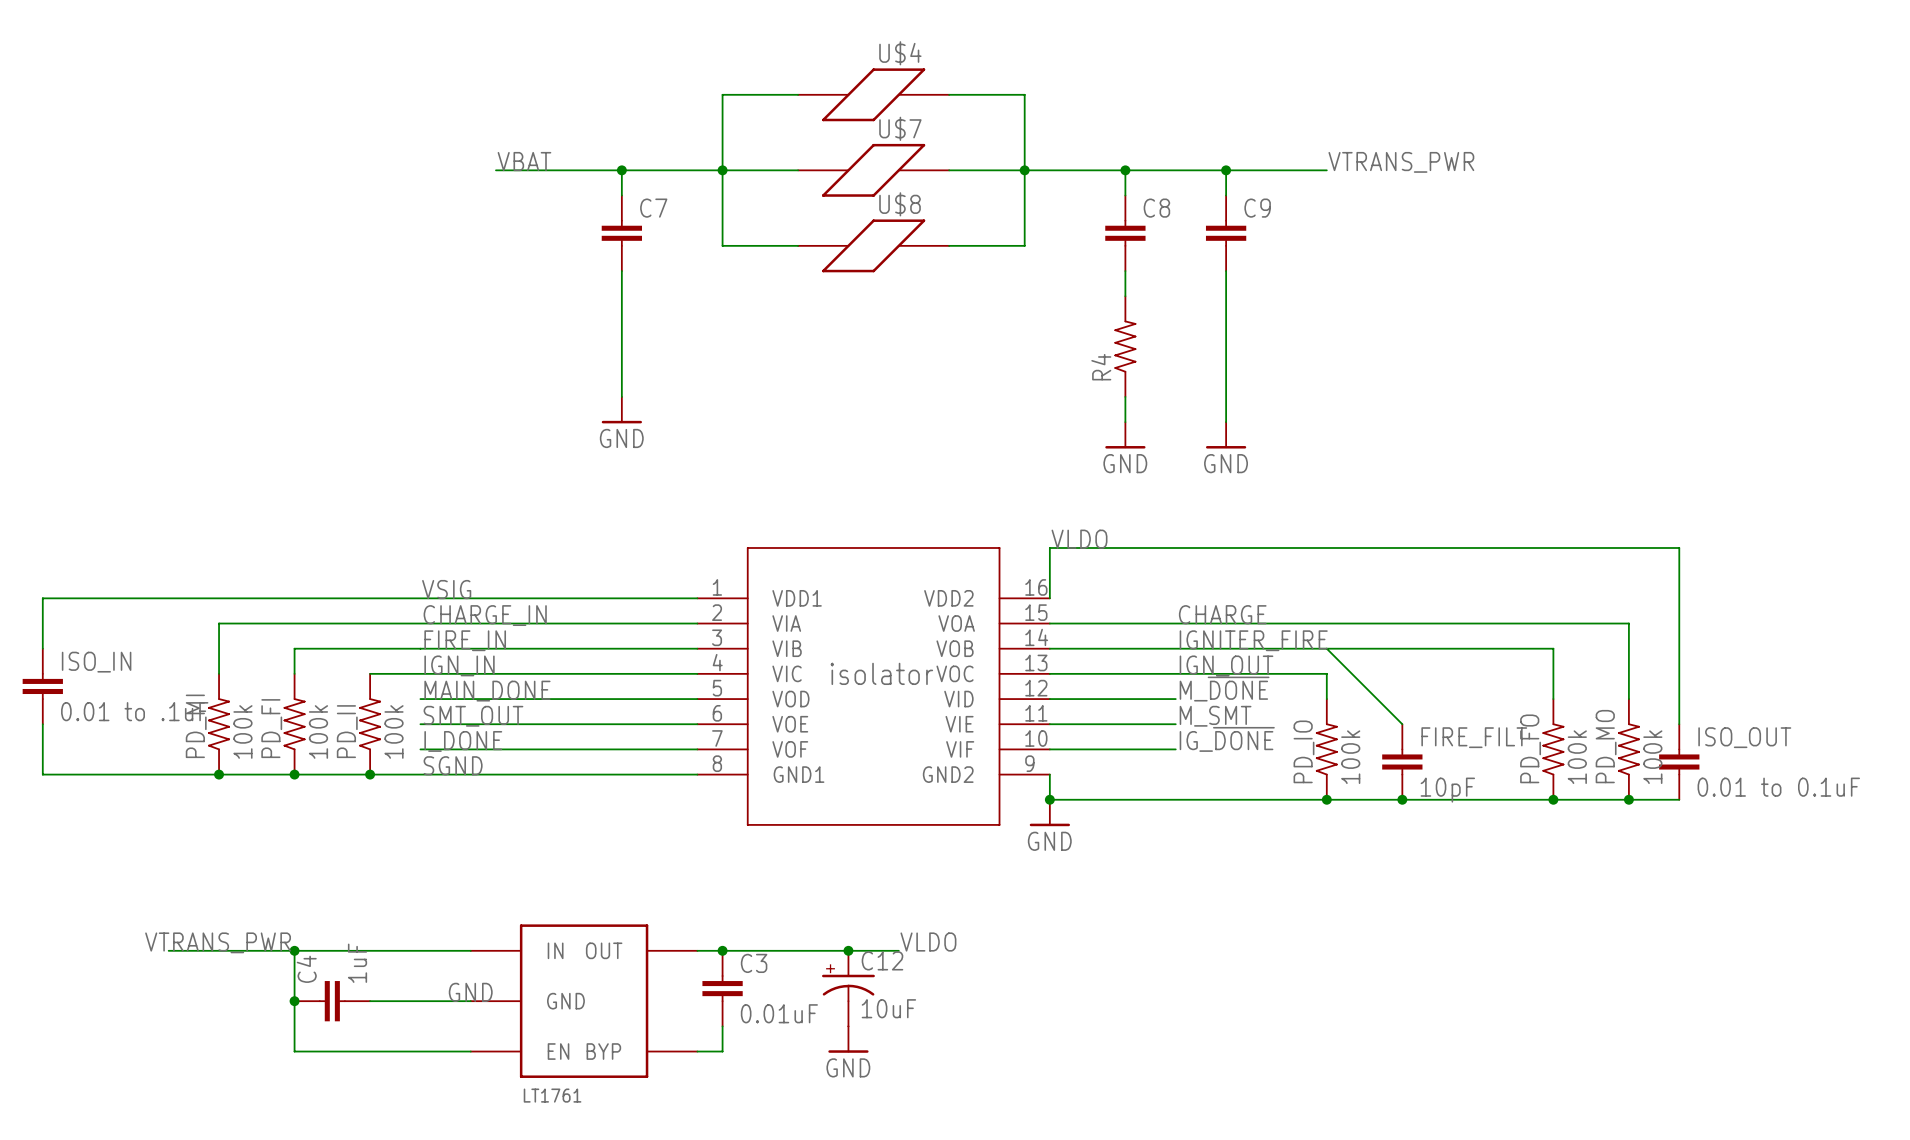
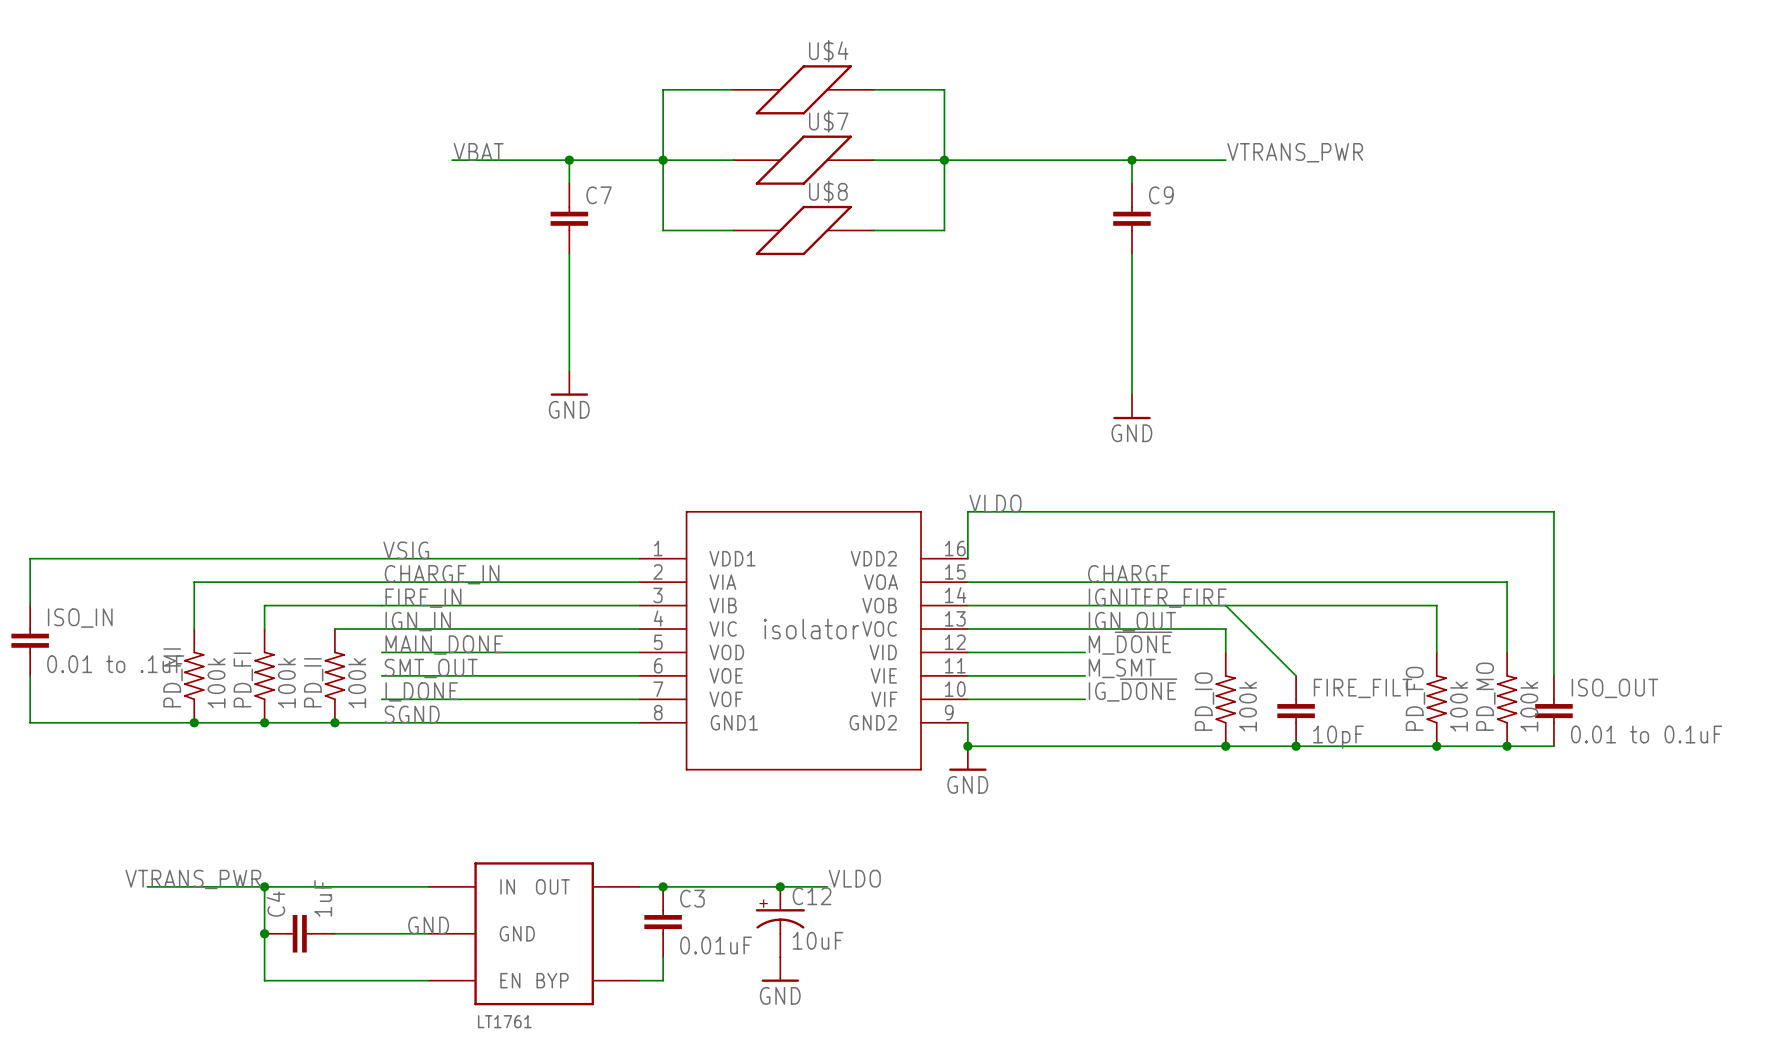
wire: (1125, 170) (1125, 195) -> none
junction: (1125, 170) -> none
C8: (1125, 233) -> none
wire: (1125, 271) (1125, 296) -> none
R4: (1125, 346) -> none
wire: (1125, 396) (1125, 422) -> none
power symbol: GND (1125, 435) -> none

